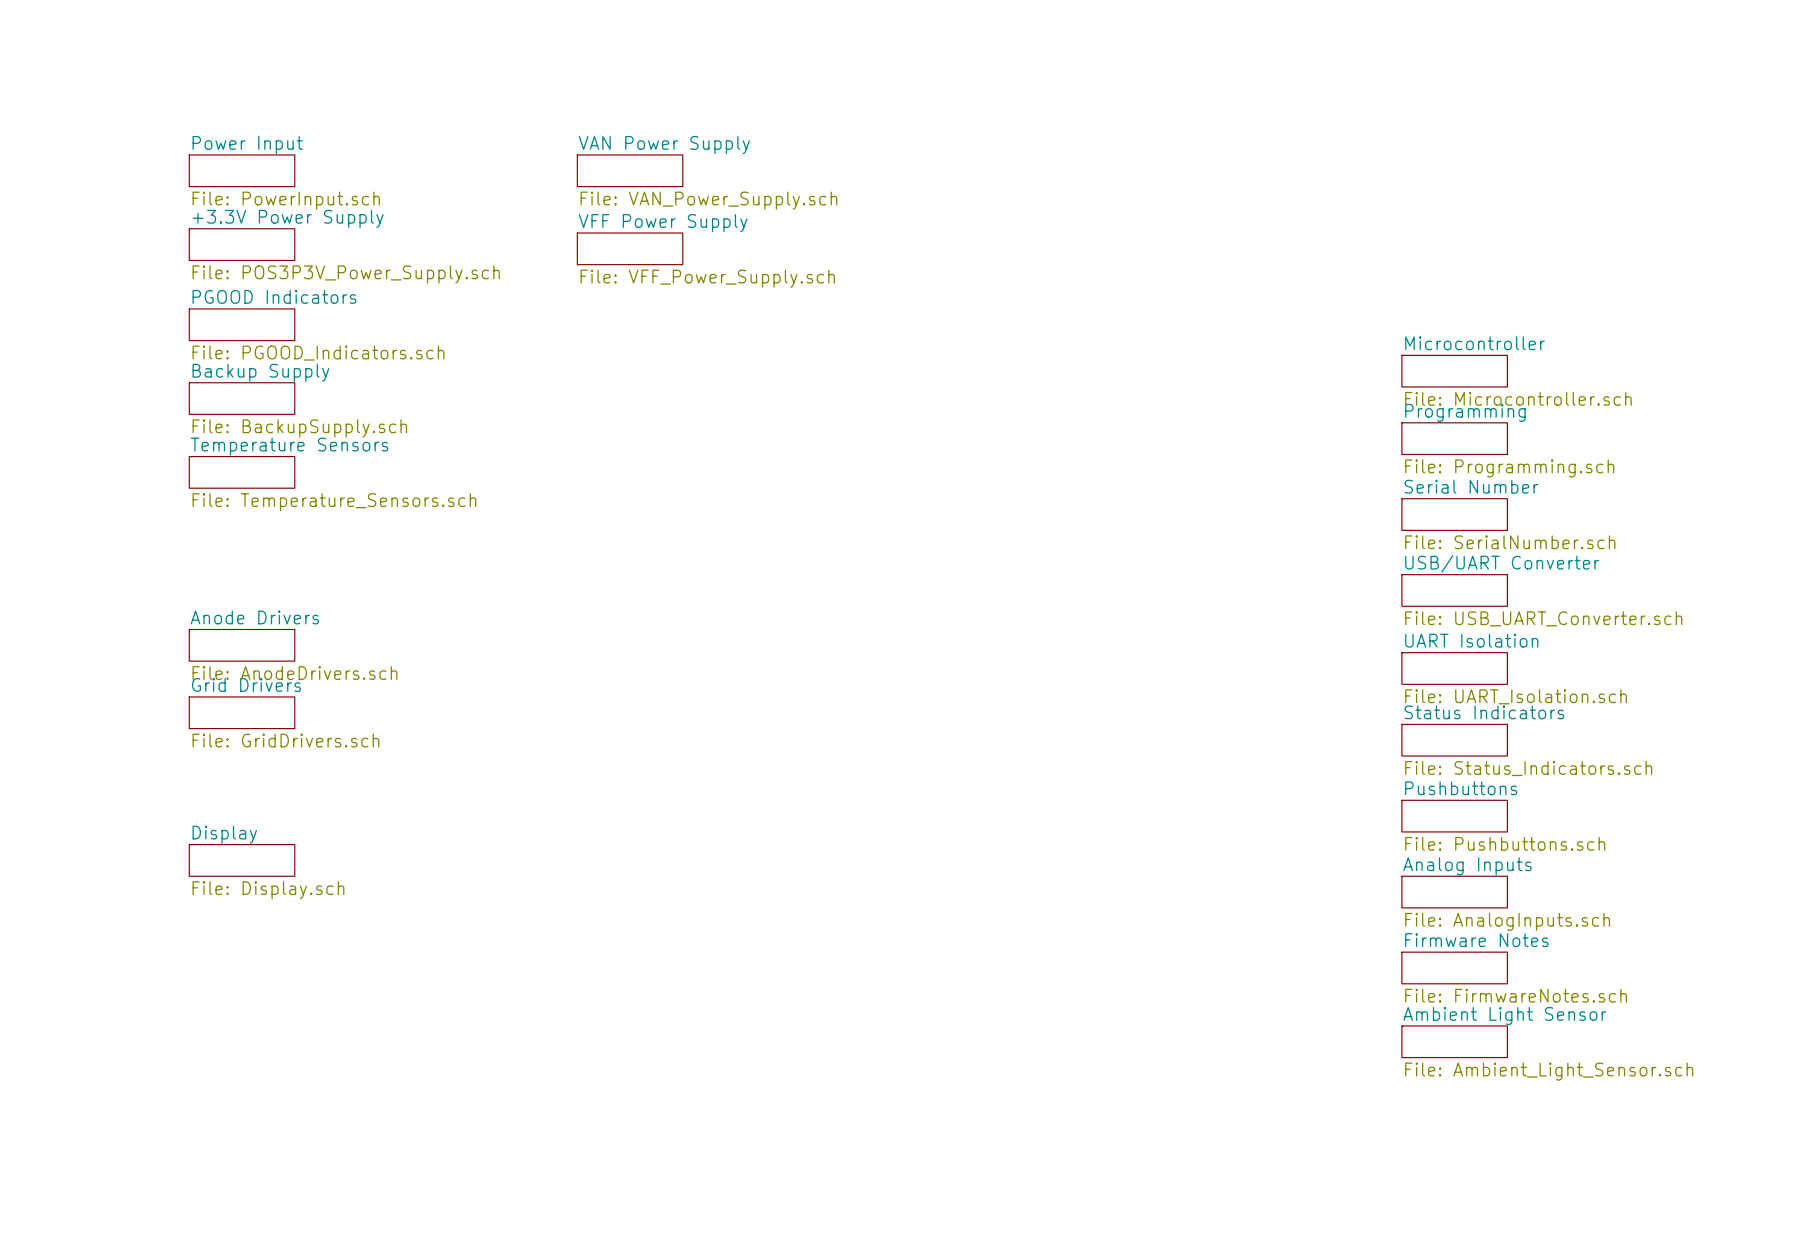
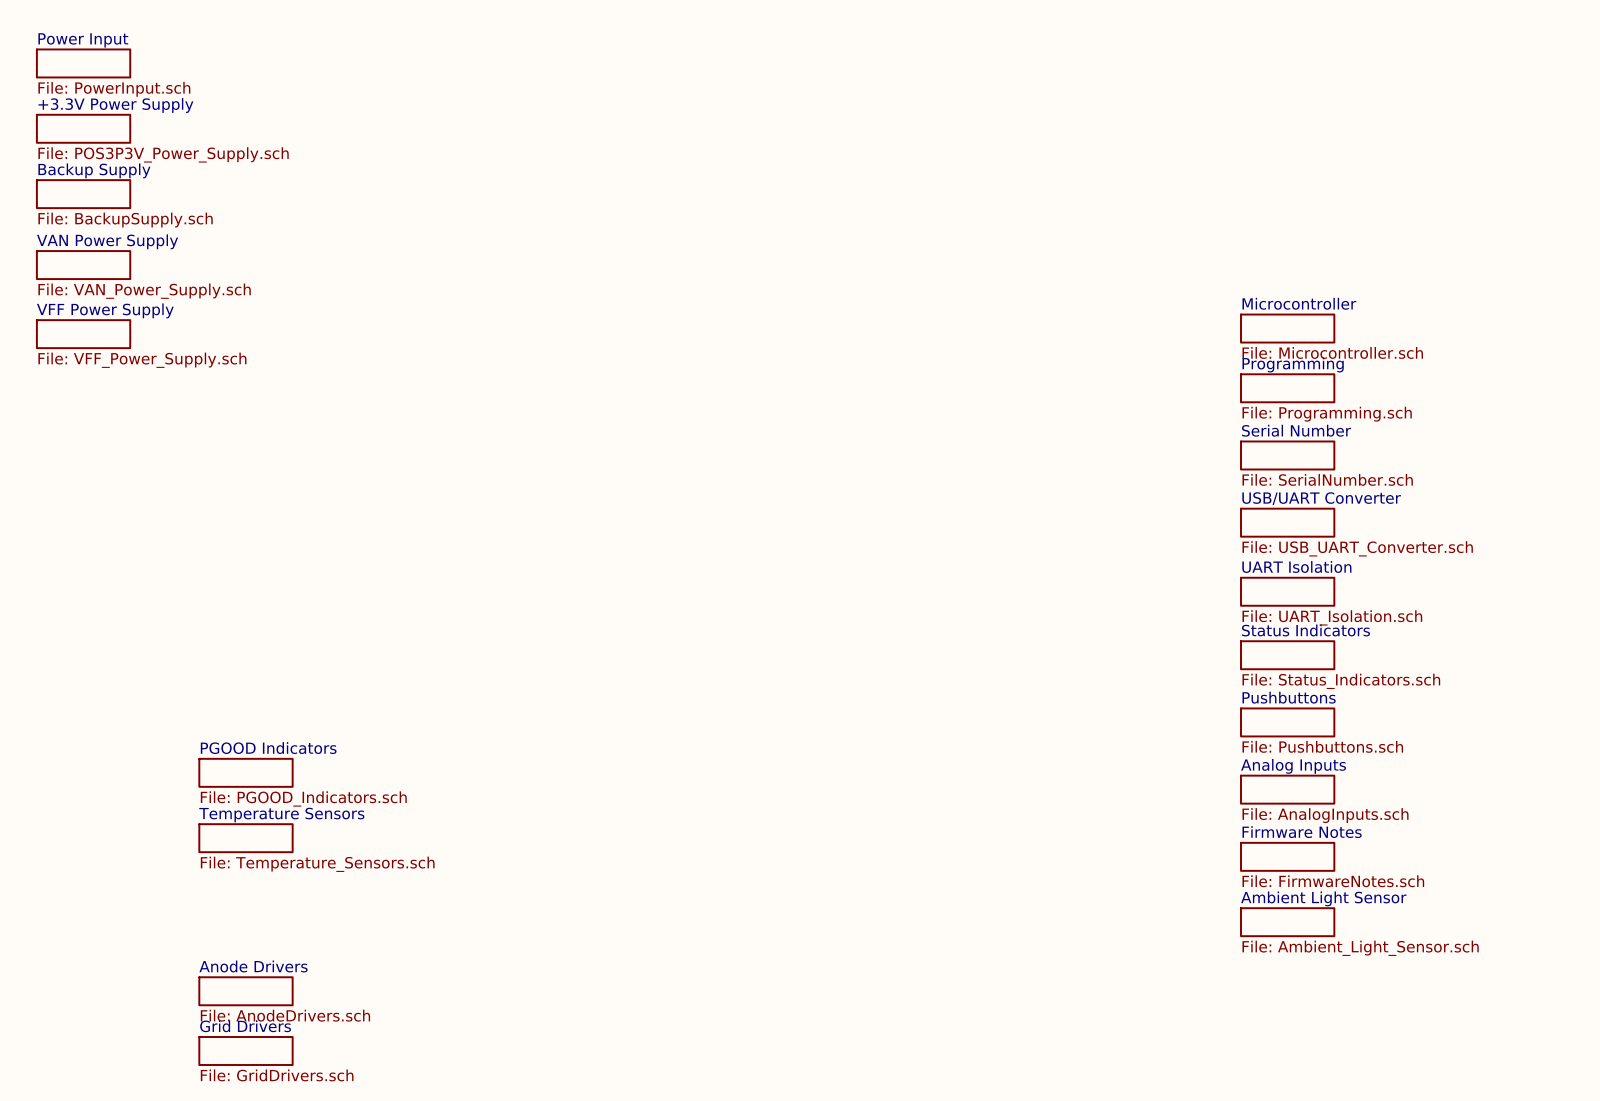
sheet Power Input position: (242, 170) -> (83, 63)
sheet VAN Power Supply: File: VAN_Power_Supply.sch (630, 170) -> none
sheet Backup Supply: none -> File: BackupSupply.sch (83, 194)
sheet +3.3V Power Supply position: (242, 244) -> (83, 128)
sheet VFF Power Supply: File: VFF_Power_Supply.sch (630, 248) -> none
sheet VAN Power Supply: none -> File: VAN_Power_Supply.sch (83, 265)
sheet PGOOD Indicators: File: PGOOD_Indicators.sch (242, 324) -> none
sheet VFF Power Supply: none -> File: VFF_Power_Supply.sch (83, 334)
sheet Backup Supply: File: BackupSupply.sch (242, 398) -> none
sheet Temperature Sensors: File: Temperature_Sensors.sch (242, 472) -> none
sheet Anode Drivers: File: AnodeDrivers.sch (242, 645) -> none
sheet Grid Drivers: File: GridDrivers.sch (242, 712) -> none
sheet Display: File: Display.sch (242, 860) -> none
sheet PGOOD Indicators: none -> File: PGOOD_Indicators.sch (245, 772)
sheet Temperature Sensors: none -> File: Temperature_Sensors.sch (245, 838)
sheet Anode Drivers: none -> File: AnodeDrivers.sch (245, 991)
sheet Grid Drivers: none -> File: GridDrivers.sch (245, 1051)

